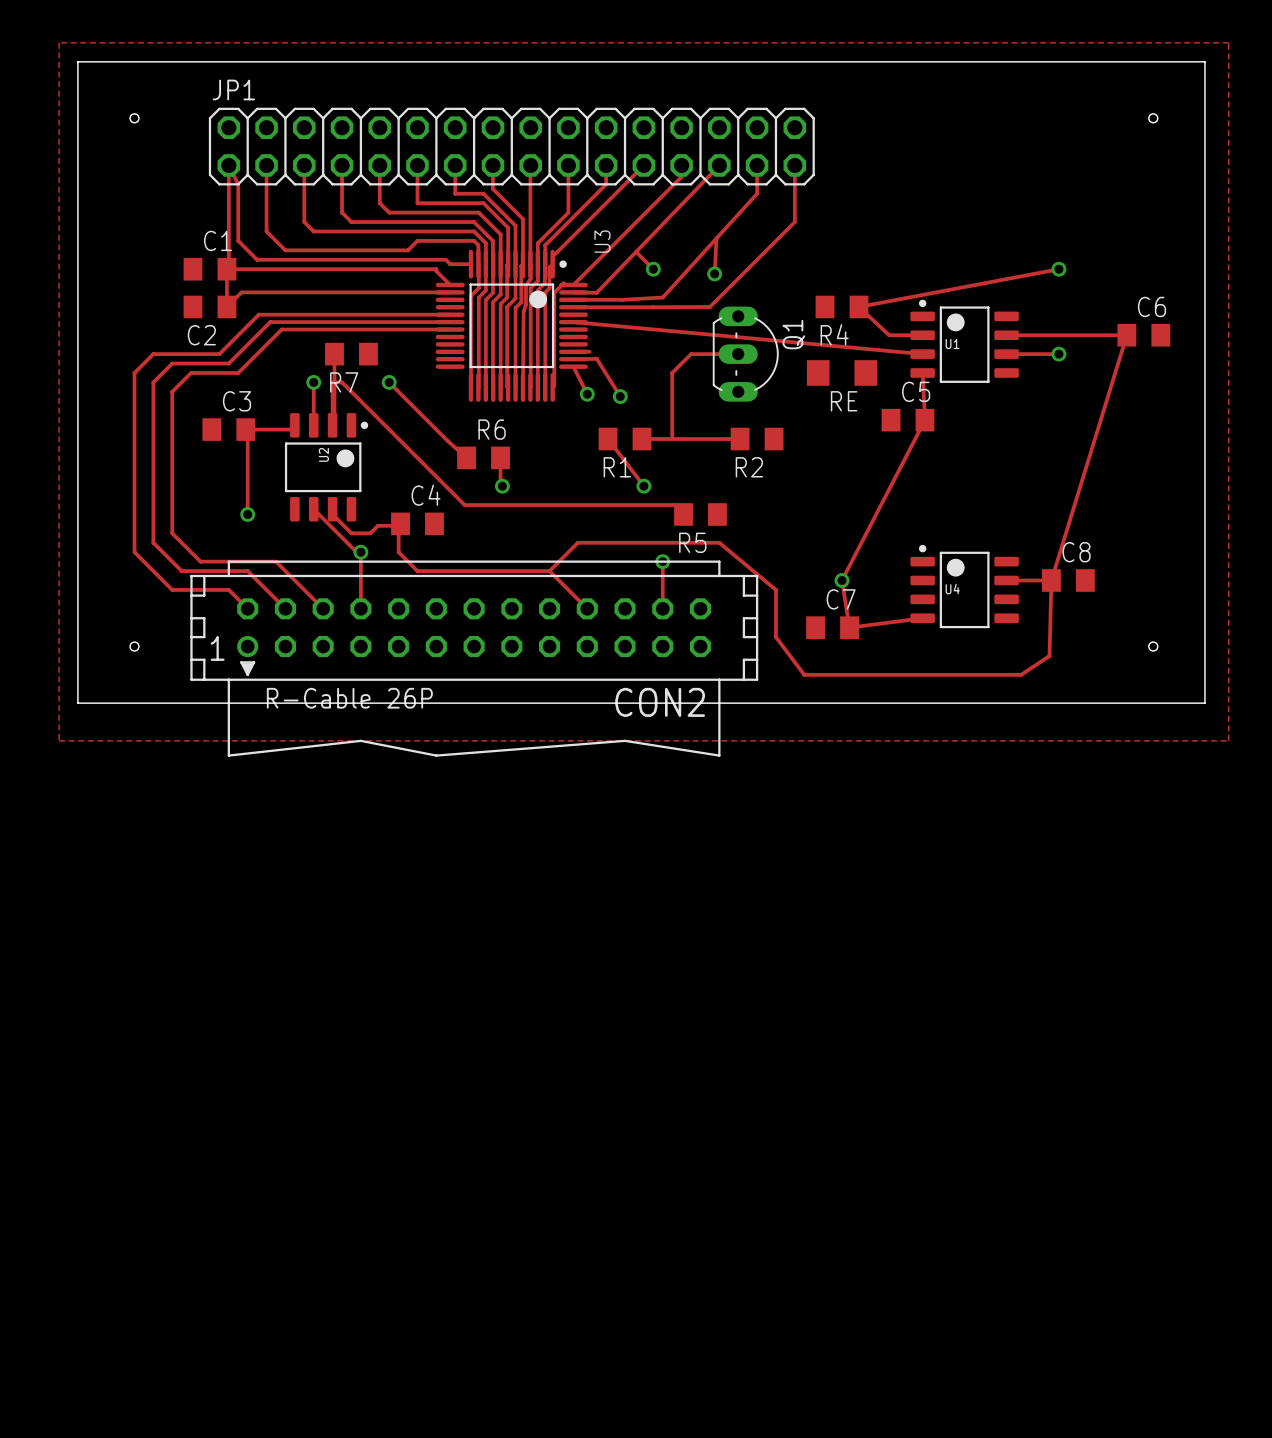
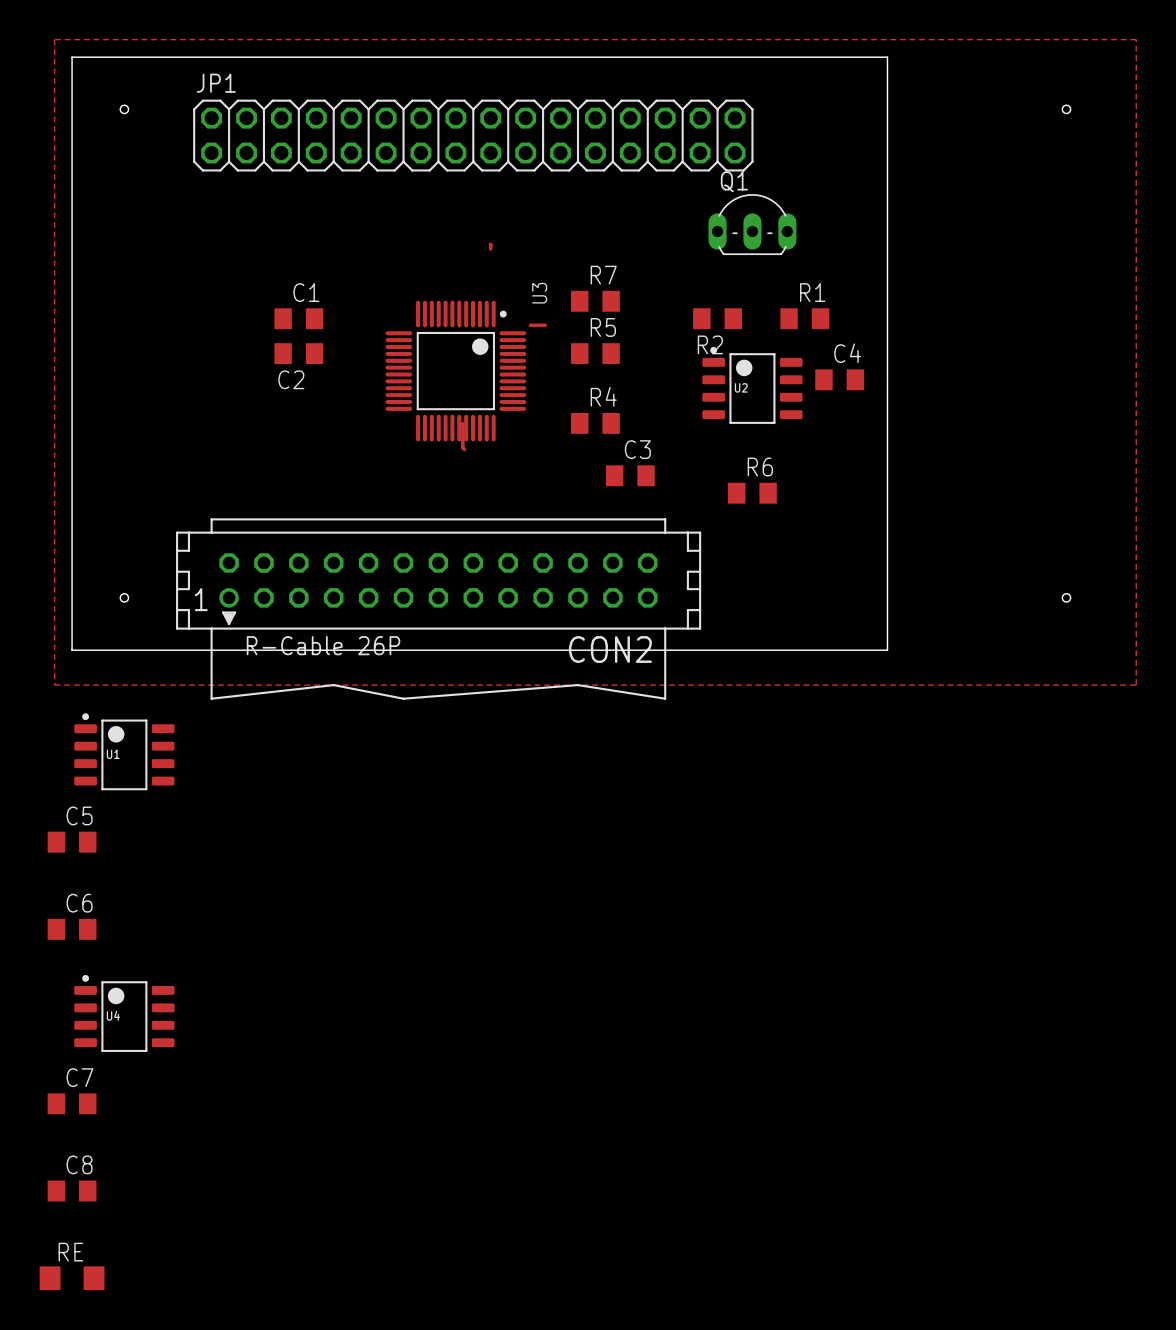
board edge: (959, 61) (1204, 61) (1204, 703) (959, 703) -> (887, 57) (887, 650)
track: (266, 165) (266, 231) (285, 250) (408, 250) (417, 240) (474, 240) (478, 245) (478, 288) (470, 295) (470, 387) -> none
track: (304, 165) (304, 222) (313, 231) (474, 231) (485, 243) (485, 290) (478, 297) (478, 387) -> none
track: (342, 165) (342, 212) (351, 222) (474, 222) (492, 240) (492, 292) (485, 299) (485, 387) -> none
track: (379, 165) (379, 203) (389, 212) (478, 212) (500, 234) (500, 294) (492, 302) (493, 387) -> none
track: (417, 165) (417, 203) (483, 203) (508, 227) (507, 297) (500, 303) (500, 387) -> none
track: (455, 165) (455, 193) (483, 193) (515, 225) (515, 298) (507, 306) (508, 387) -> none
track: (492, 165) (492, 189) (522, 219) (521, 302) (515, 307) (515, 387) -> none
track: (530, 165) (530, 278) (525, 285) (525, 304) (523, 311) (522, 387) -> none
track: (568, 165) (568, 212) (537, 243) (537, 280) (530, 288) (530, 387) -> none
track: (606, 165) (606, 184) (545, 245) (544, 283) (537, 290) (537, 387) -> none
track: (643, 165) (552, 256) (552, 264) (549, 267) (549, 288) (544, 292) (545, 387) -> none
track: (681, 165) (681, 176) (573, 284) (563, 283) (554, 292) (554, 385) (552, 387) -> none
track: (719, 165) (596, 292) (573, 292) -> none
track: (757, 165) (757, 193) (662, 297) (573, 299) -> none
track: (794, 165) (794, 222) (709, 306) (573, 307) -> none
track: (716, 238) (714, 273) -> none
track: (636, 251) (653, 269) -> none
track: (470, 264) (450, 264) (445, 259) (257, 259) (238, 240) (238, 184) (228, 165) (228, 267) (226, 269) -> none
C1 position: (209, 269) -> (298, 318)
track: (226, 269) (436, 269) (450, 284) -> none
track: (226, 269) (226, 306) (241, 292) (450, 292) -> none
via: (653, 269) -> none
track: (1058, 269) (858, 306) (889, 335) (922, 335) -> none
via: (1058, 269) -> none
via: (714, 273) -> none
C2 position: (209, 306) -> (298, 353)
R4 position: (841, 306) -> (595, 423)
track: (450, 314) (258, 314) (219, 354) (153, 354) (134, 372) (134, 552) (172, 589) (228, 589) (247, 608) -> none
track: (450, 322) (270, 322) (228, 363) (172, 363) (153, 382) (153, 542) (181, 571) (247, 571) (285, 608) -> none
track: (573, 322) (922, 354) -> none
U3 position: (511, 325) -> (455, 371)
track: (450, 329) (281, 329) (238, 372) (191, 372) (172, 391) (172, 533) (200, 561) (276, 561) (323, 608) -> none
R4 name position: R4 (834, 334) -> R4 (603, 396)
track: (1006, 335) (1126, 335) (1051, 580) -> none
C6 position: (1143, 335) -> (72, 929)
U1 position: (964, 341) -> (124, 751)
track: (334, 354) (334, 423) (332, 425) (332, 382) (342, 382) (464, 505) (674, 505) (683, 514) -> none
R7 position: (351, 354) -> (595, 301)
track: (738, 354) (691, 354) (672, 372) (672, 439) -> none
Q1 rotation: 0° (745, 354) -> 90° counterclockwise (752, 224)
Q1 position: (745, 354) -> (752, 224)
track: (1006, 354) (1058, 354) -> none
via: (1058, 354) -> none
track: (573, 359) (596, 358) (620, 396) -> none
track: (573, 366) (587, 394) -> none
RE: (841, 372) -> none
track: (922, 372) (925, 420) (841, 580) (849, 627) (922, 618) -> none
track: (313, 382) (313, 425) -> none
via: (313, 382) -> none
R7 name position: R7 (344, 382) -> R7 (603, 275)
track: (389, 382) (466, 457) -> none
via: (389, 382) -> none
via: (587, 394) -> none
via: (620, 396) -> none
C5 position: (908, 420) -> (72, 842)
track: (294, 425) (290, 429) (245, 429) (247, 431) (247, 514) -> none
C3 position: (228, 429) -> (630, 475)
track: (608, 439) (643, 486) -> none
R1 position: (625, 439) -> (804, 318)
track: (642, 439) (740, 439) -> none
R2 position: (757, 439) -> (717, 318)
R6 position: (483, 457) -> (752, 493)
U2 rotation: 0° (326, 467) -> 90° counterclockwise (752, 385)
U2 position: (326, 467) -> (752, 385)
R1 name position: R1 (617, 467) -> R1 (812, 292)
via: (502, 486) -> none
via: (643, 486) -> none
track: (313, 509) (356, 552) (360, 552) (360, 608) -> none
track: (332, 509) (332, 514) (351, 533) (370, 533) (377, 525) (398, 525) -> none
via: (247, 514) -> none
R5 position: (700, 514) -> (595, 353)
C4 position: (417, 523) -> (839, 379)
track: (398, 525) (398, 552) (417, 571) (549, 571) -> none
R5 name position: R5 (692, 542) -> R5 (603, 327)
via: (360, 552) -> none
track: (662, 561) (662, 608) -> none
via: (662, 561) -> none
track: (549, 571) (587, 608) -> none
track: (549, 571) (577, 542) (719, 542) (775, 589) (775, 637) (804, 674) (1021, 674) (1049, 655) (1051, 580) -> none
via: (841, 580) -> none
track: (1006, 580) (1051, 580) -> none
C8 position: (1068, 580) -> (72, 1191)
U4 position: (964, 586) -> (124, 1013)
C7 position: (832, 627) -> (72, 1103)
RE: none -> (72, 1278)

